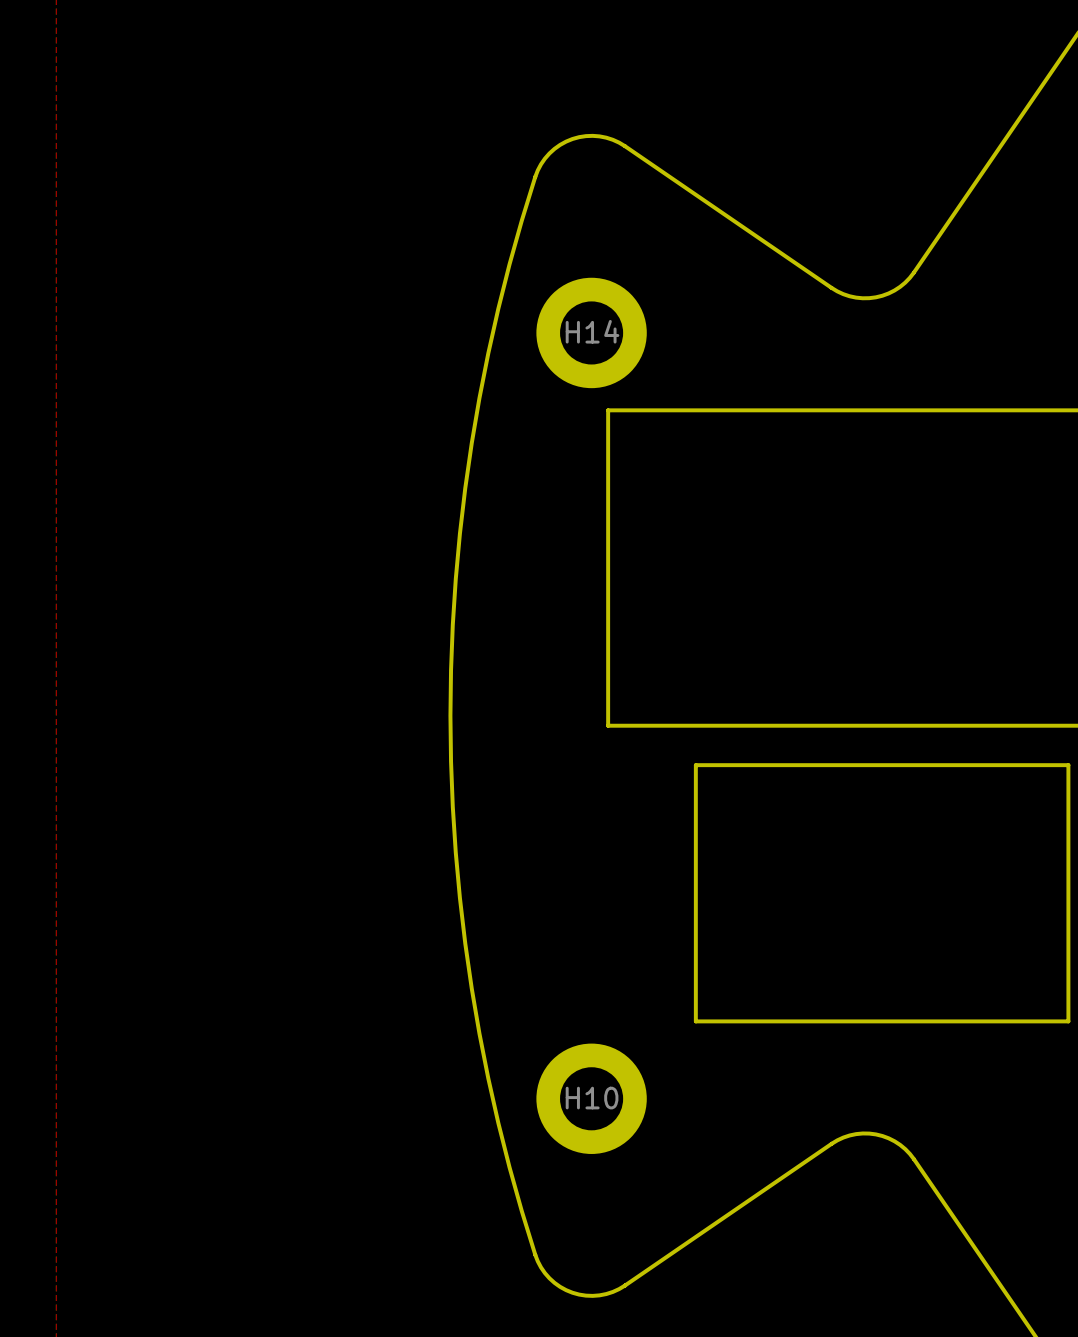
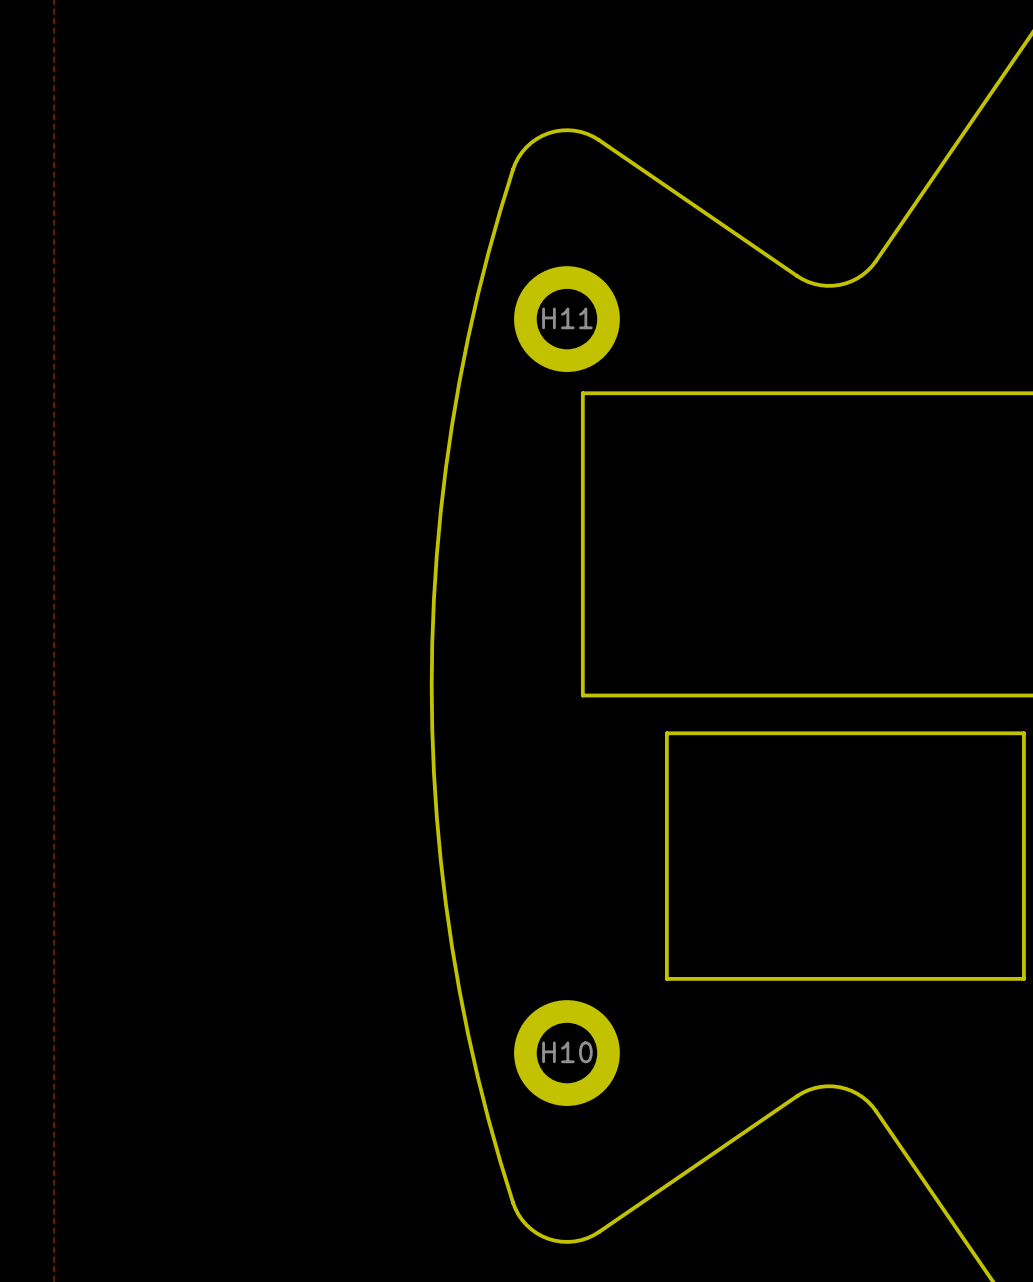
H14 name: H14 (592, 331) -> H11 (567, 318)

